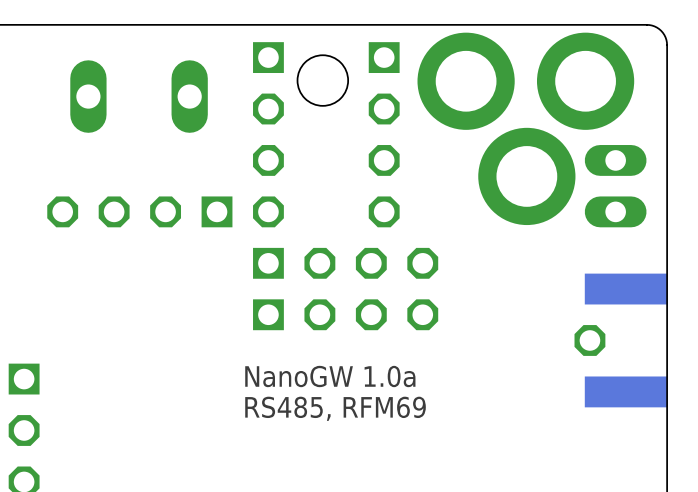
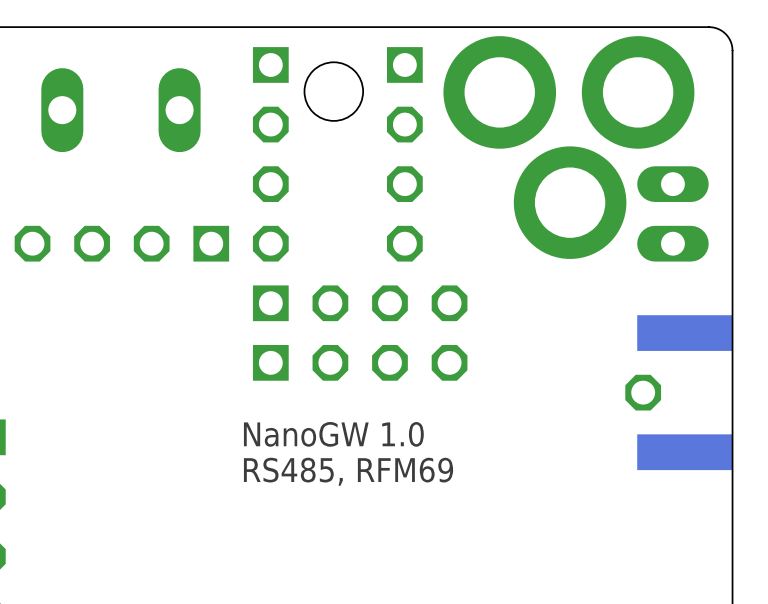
text: NanoGW 1.0a (330, 376) -> NanoGW 1.0 (333, 434)

